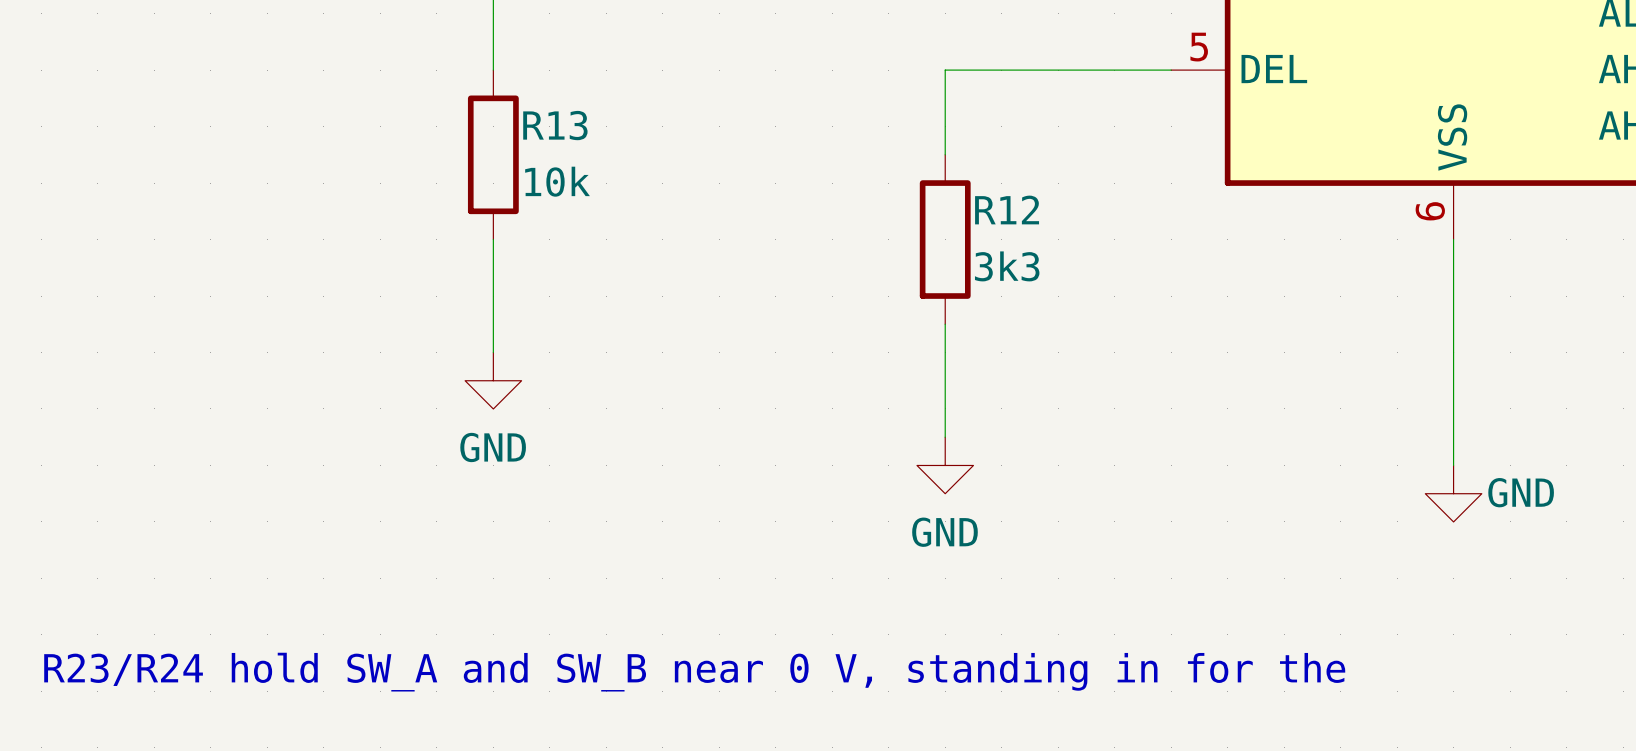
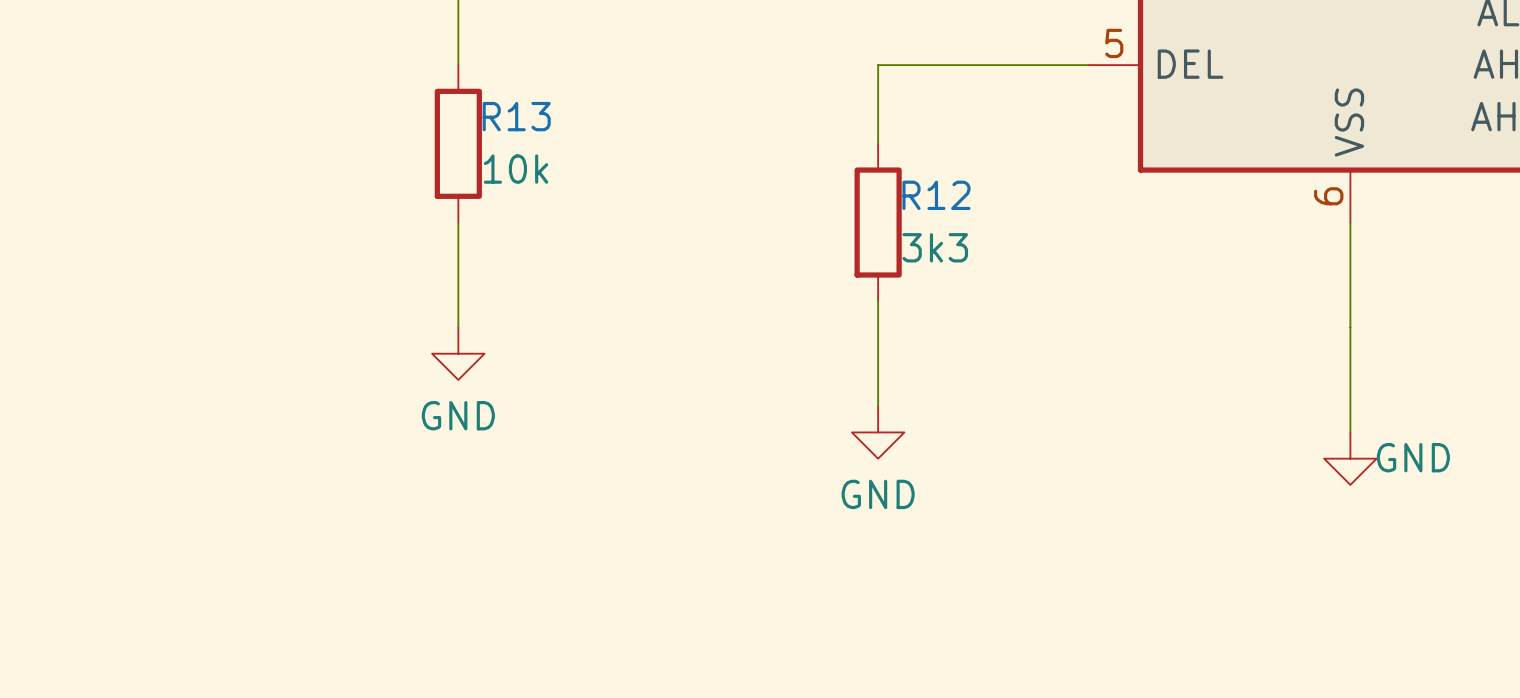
text: R23/R24 hold SW_A and SW_B near 0 V, standing in for the (694, 672) -> none

